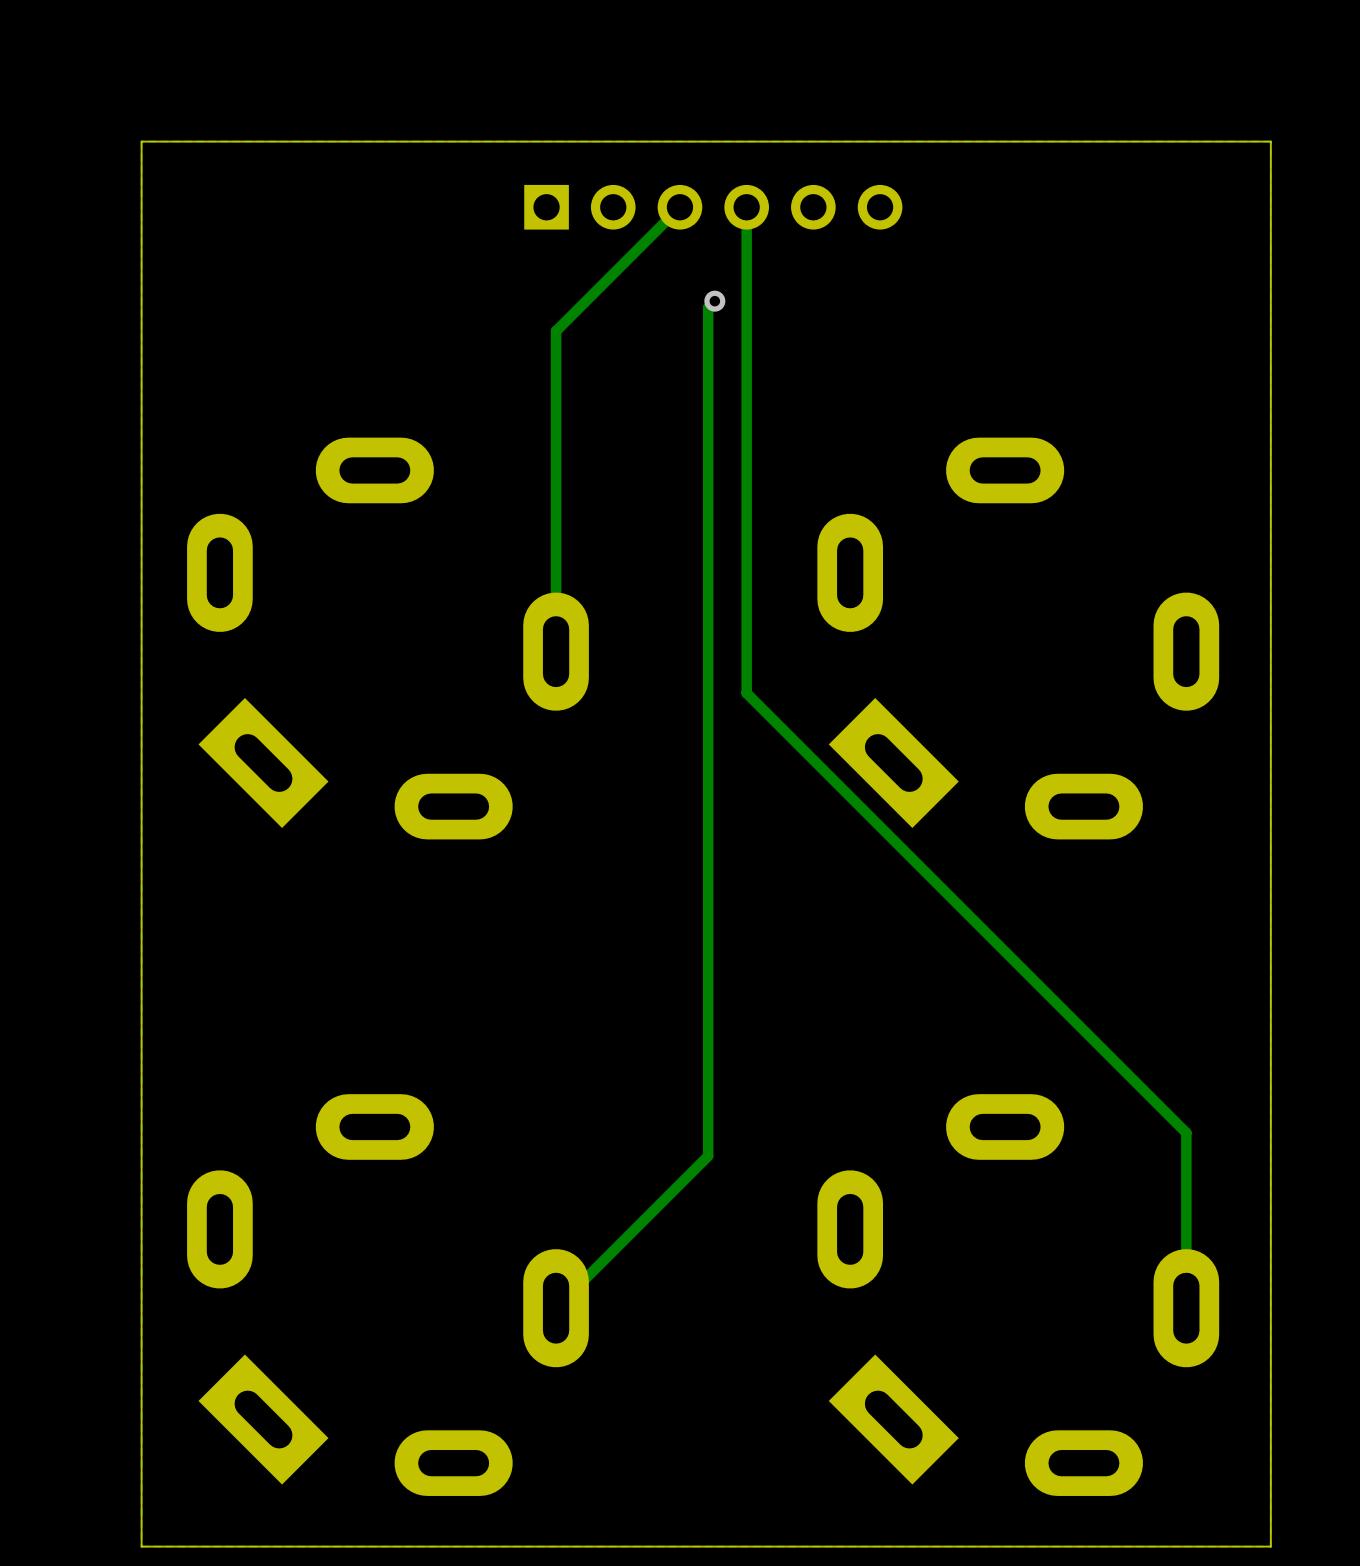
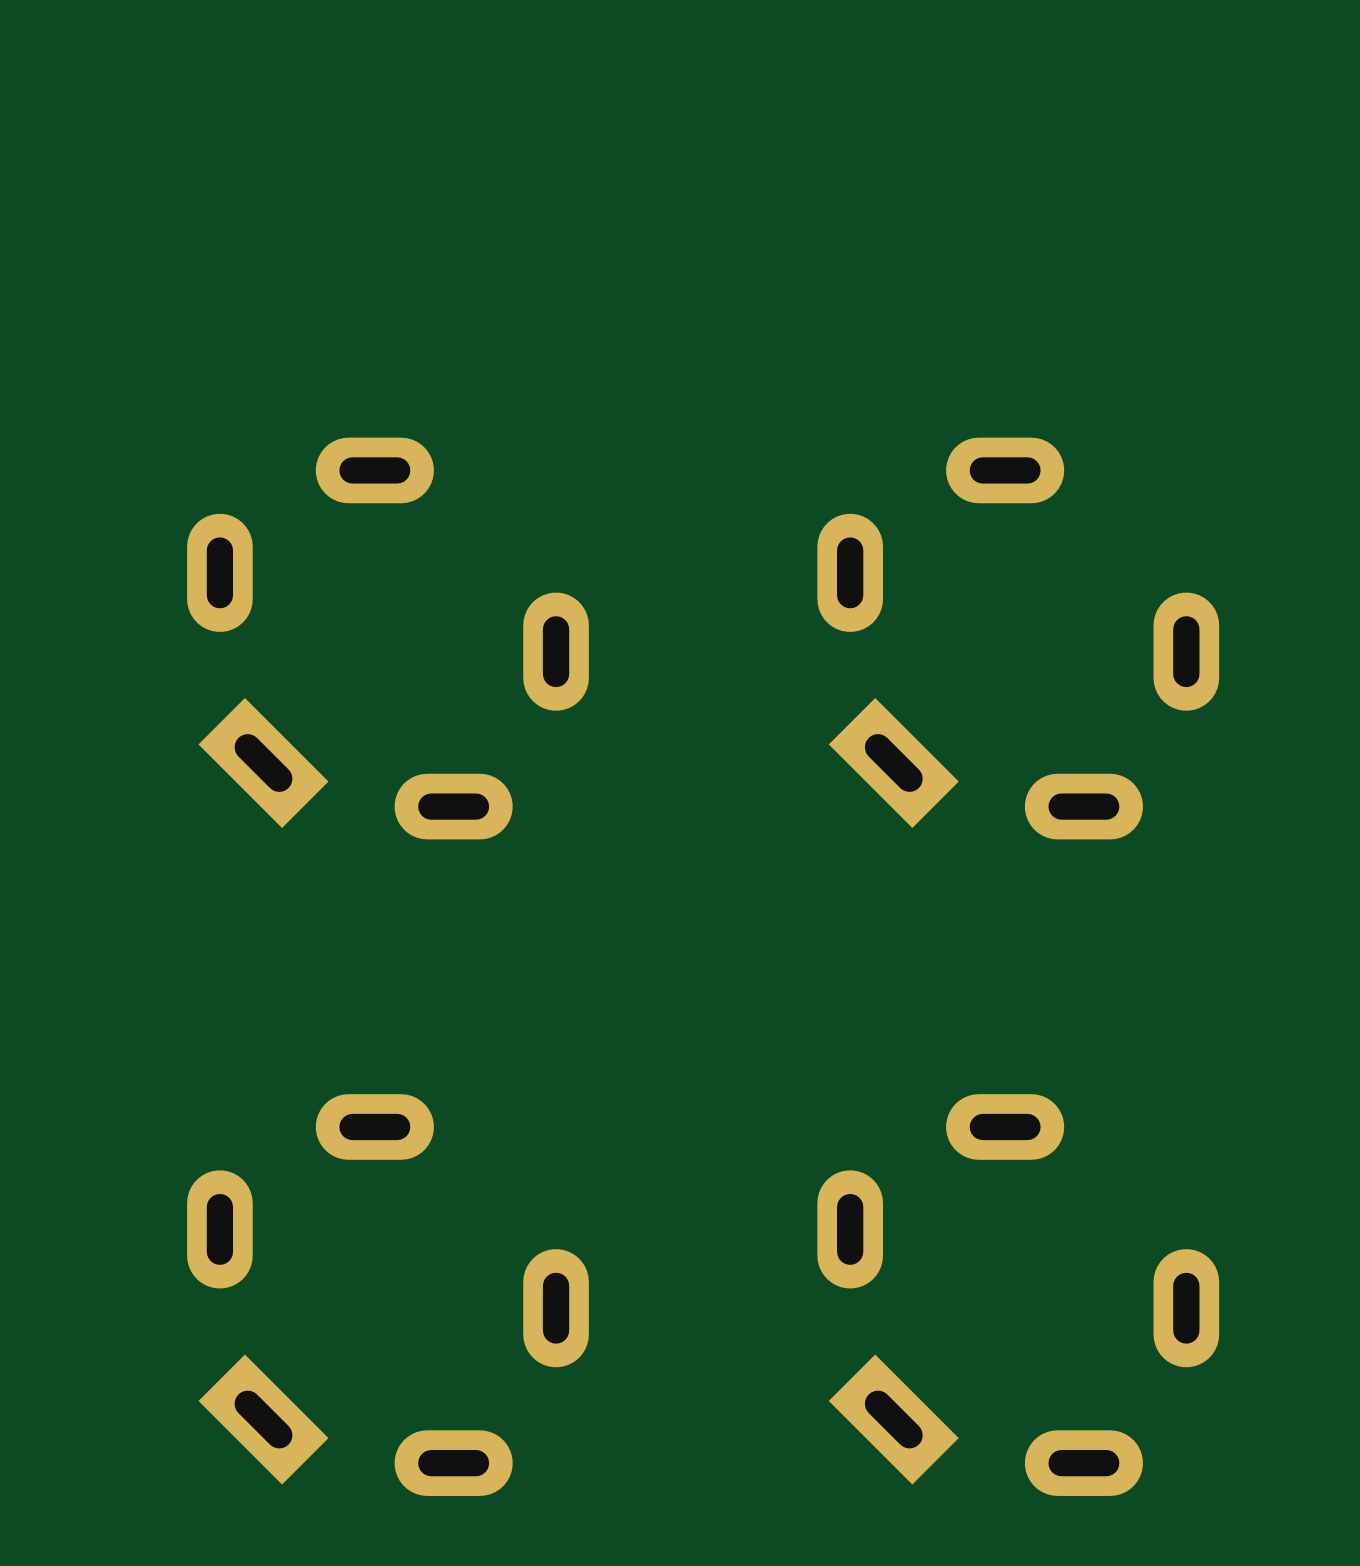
board edge: (1270, 141) (141, 141) (141, 1546) (1270, 1546) (1270, 141) -> none
track: (679, 207) (556, 331) (556, 651) -> none
part: (713, 207) -> none
track: (746, 207) (746, 693) (1186, 1132) (1186, 1308) -> none
track: (714, 301) (708, 307) (708, 1156) (556, 1308) -> none
via: (714, 301) -> none

